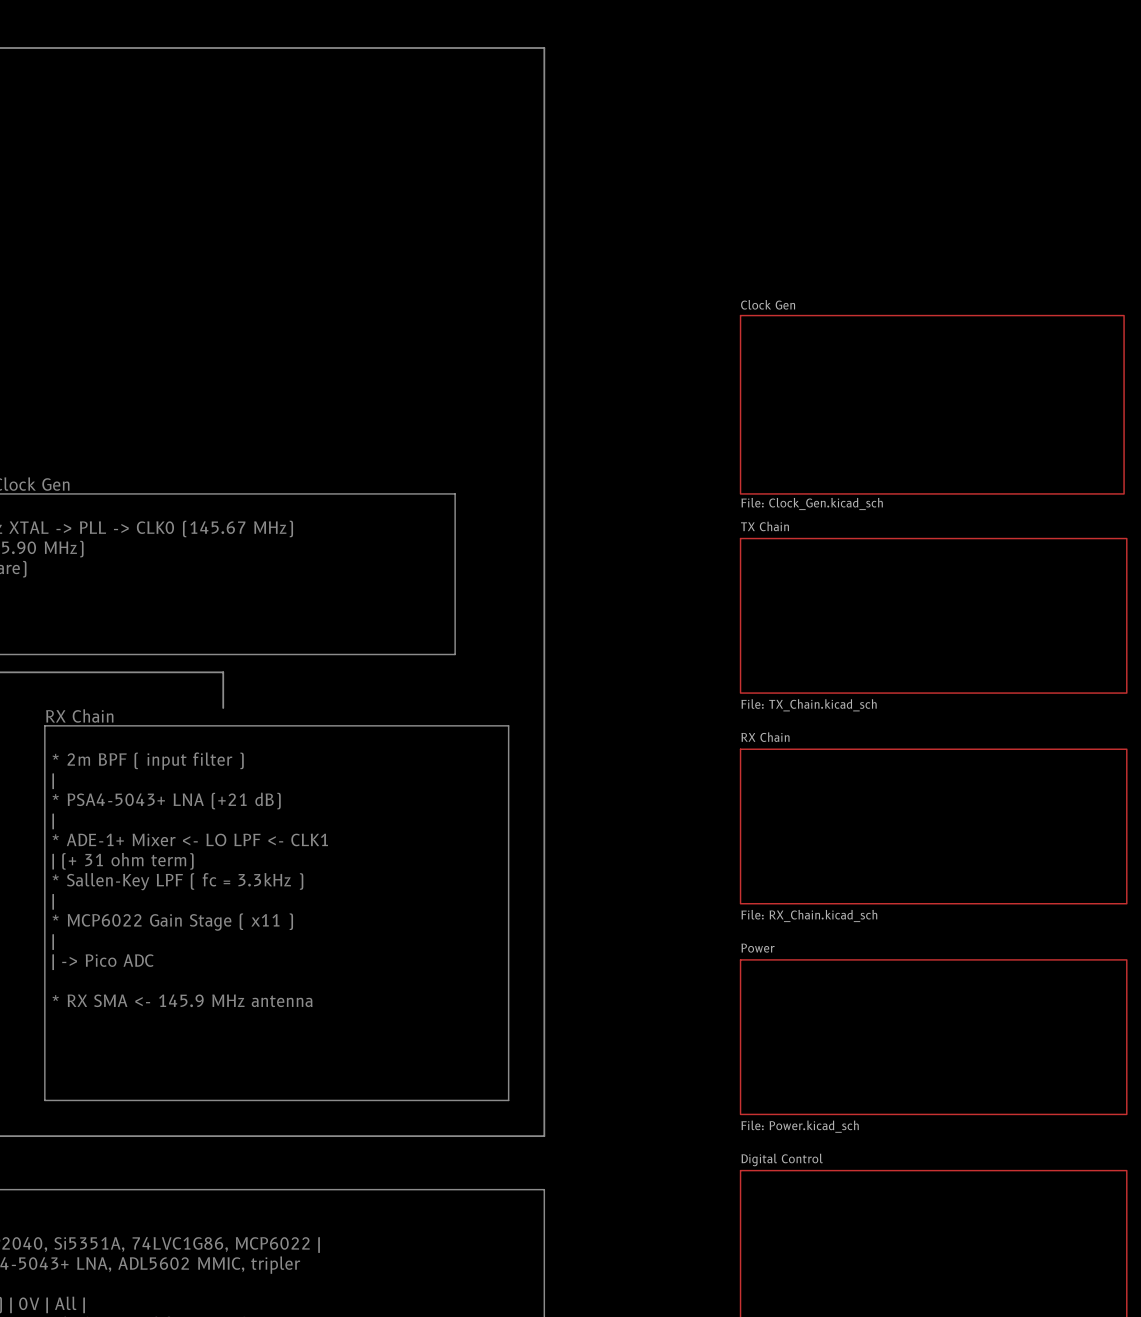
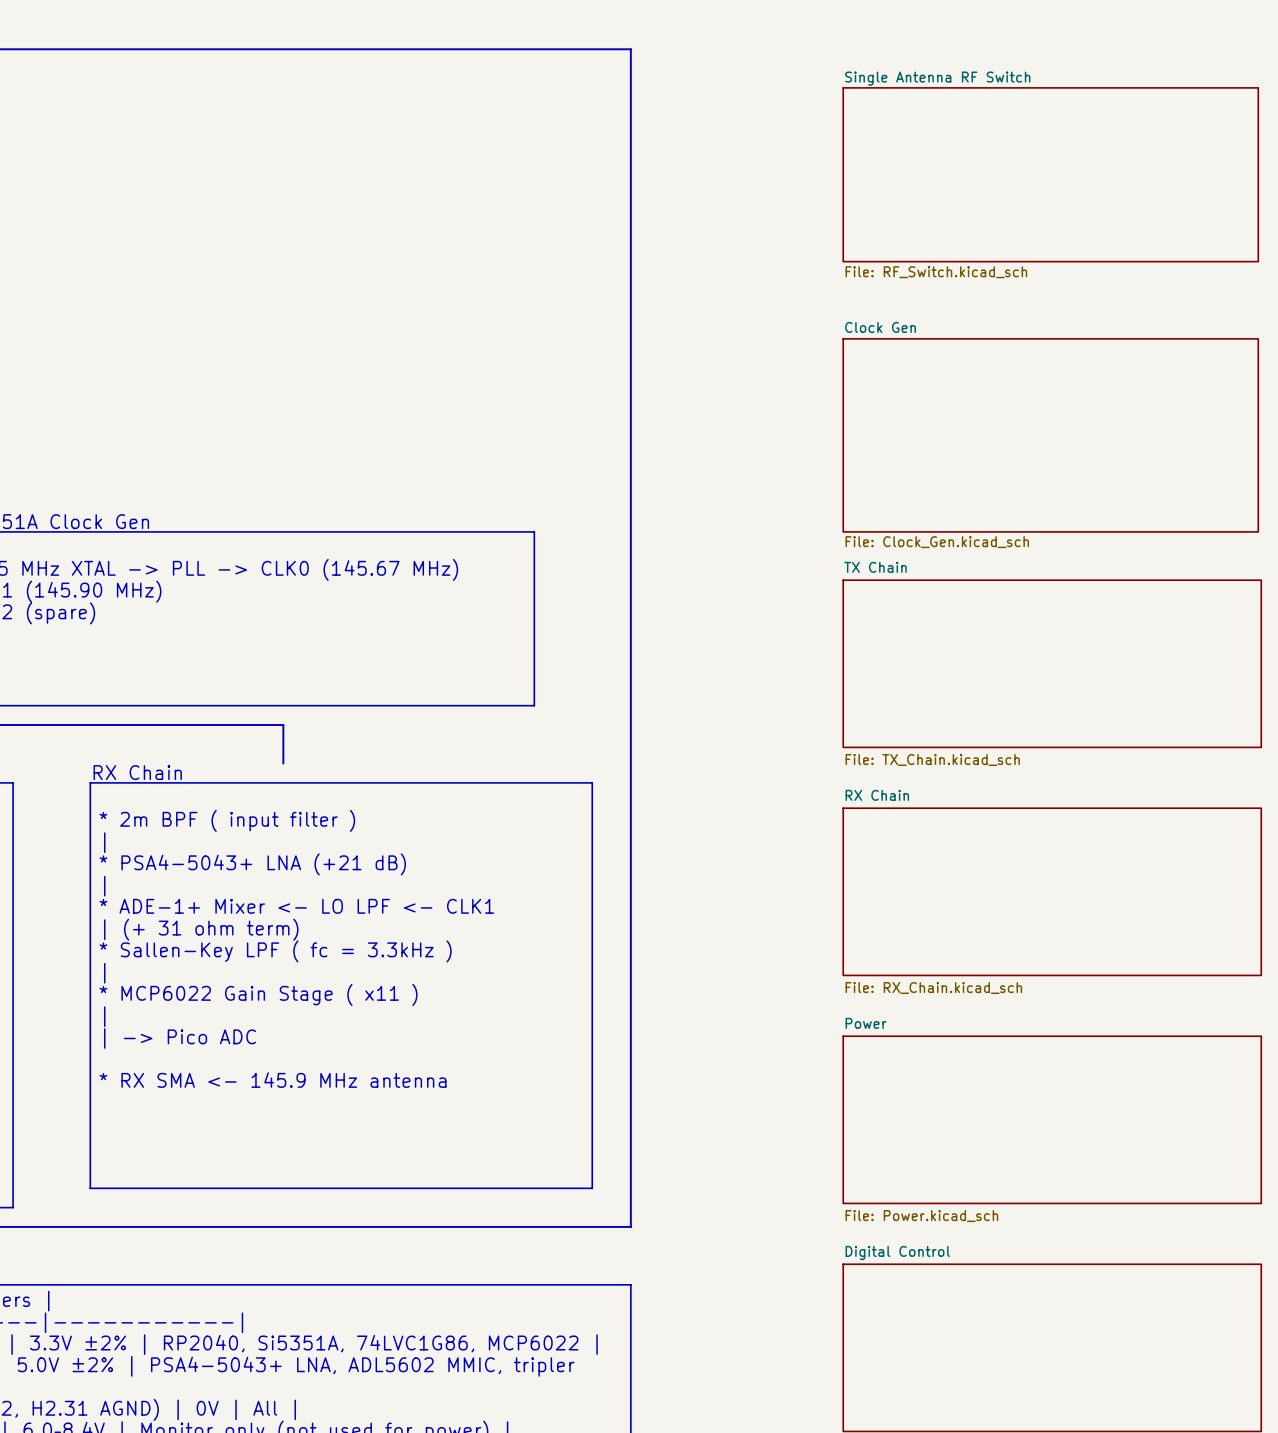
sheet Single Antenna RF Switch: none -> File: RF_Switch.kicad_sch (1050, 174)

